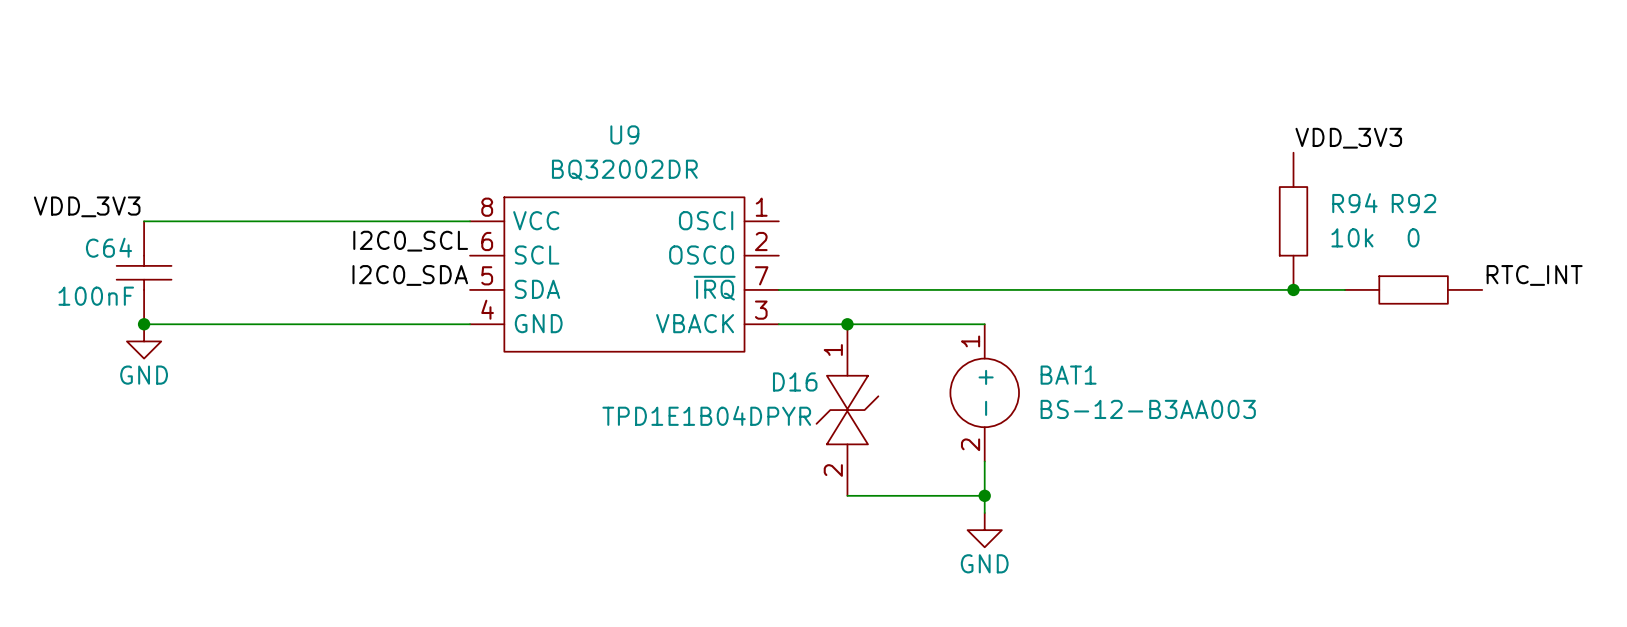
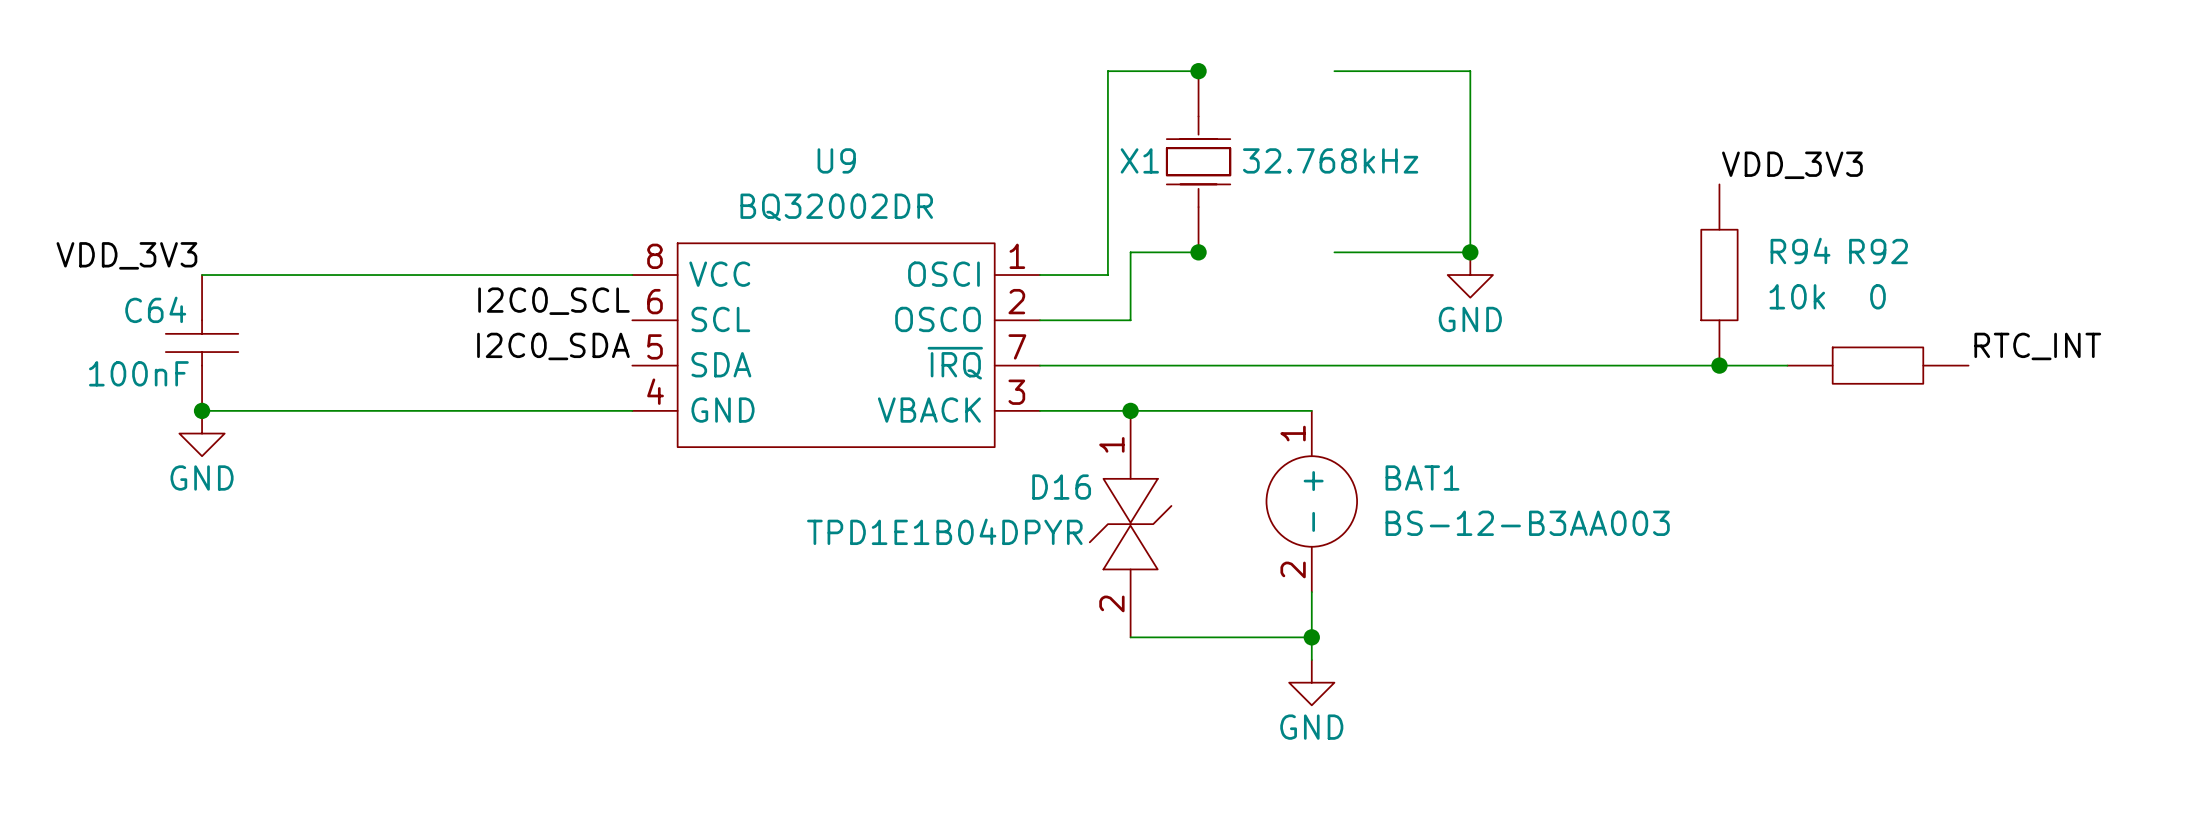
wire: none -> (1198, 71) (1107, 71) (1107, 275) (1040, 275)
junction: none -> (1198, 71)
wire: none -> (1334, 71) (1470, 71) (1470, 252) (1334, 252)
X1: none -> (1198, 161)
wire: none -> (1198, 252) (1130, 252) (1130, 320) (1040, 320)
junction: none -> (1198, 252)
junction: none -> (1470, 252)
power symbol: none -> GND (1470, 275)

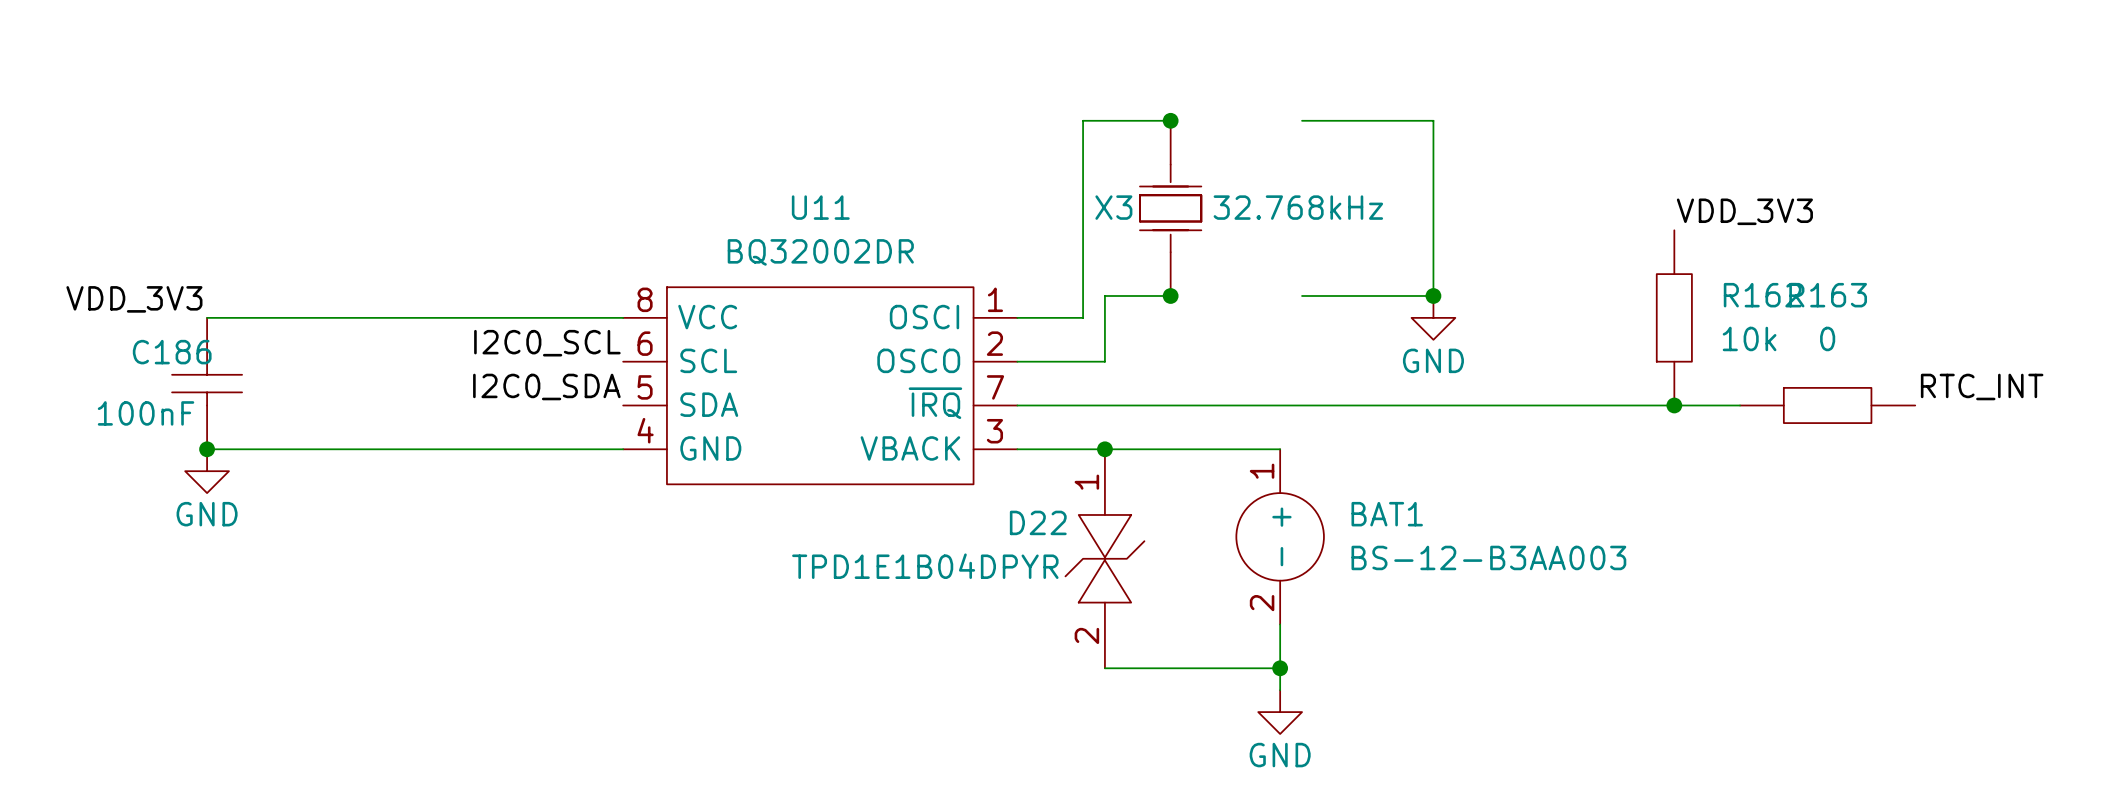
U9 name: U9 (836, 160) -> U11 (820, 207)
X1 name: X1 (1139, 160) -> X3 (1113, 207)
R94 name: R94 (1800, 250) -> R162 (1762, 295)
R92 name: R92 (1878, 251) -> R163 (1828, 295)
C64 name: C64 (155, 309) -> C186 (172, 352)
D16 name: D16 (1061, 487) -> D22 (1038, 522)

